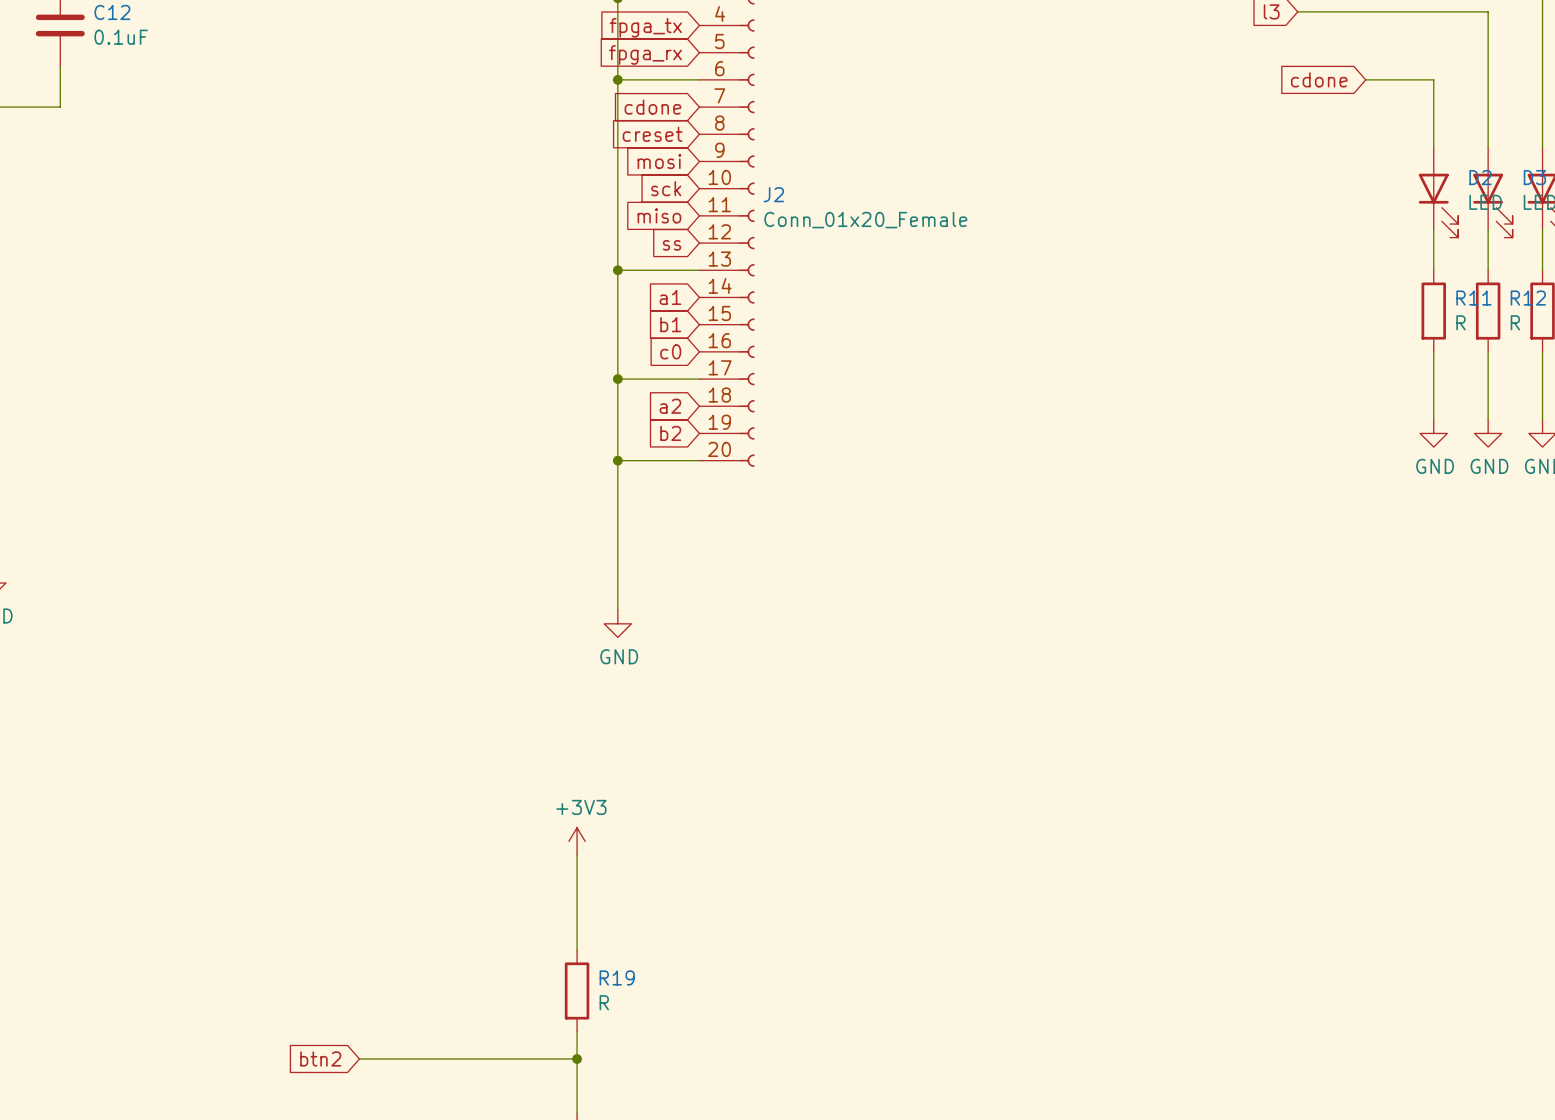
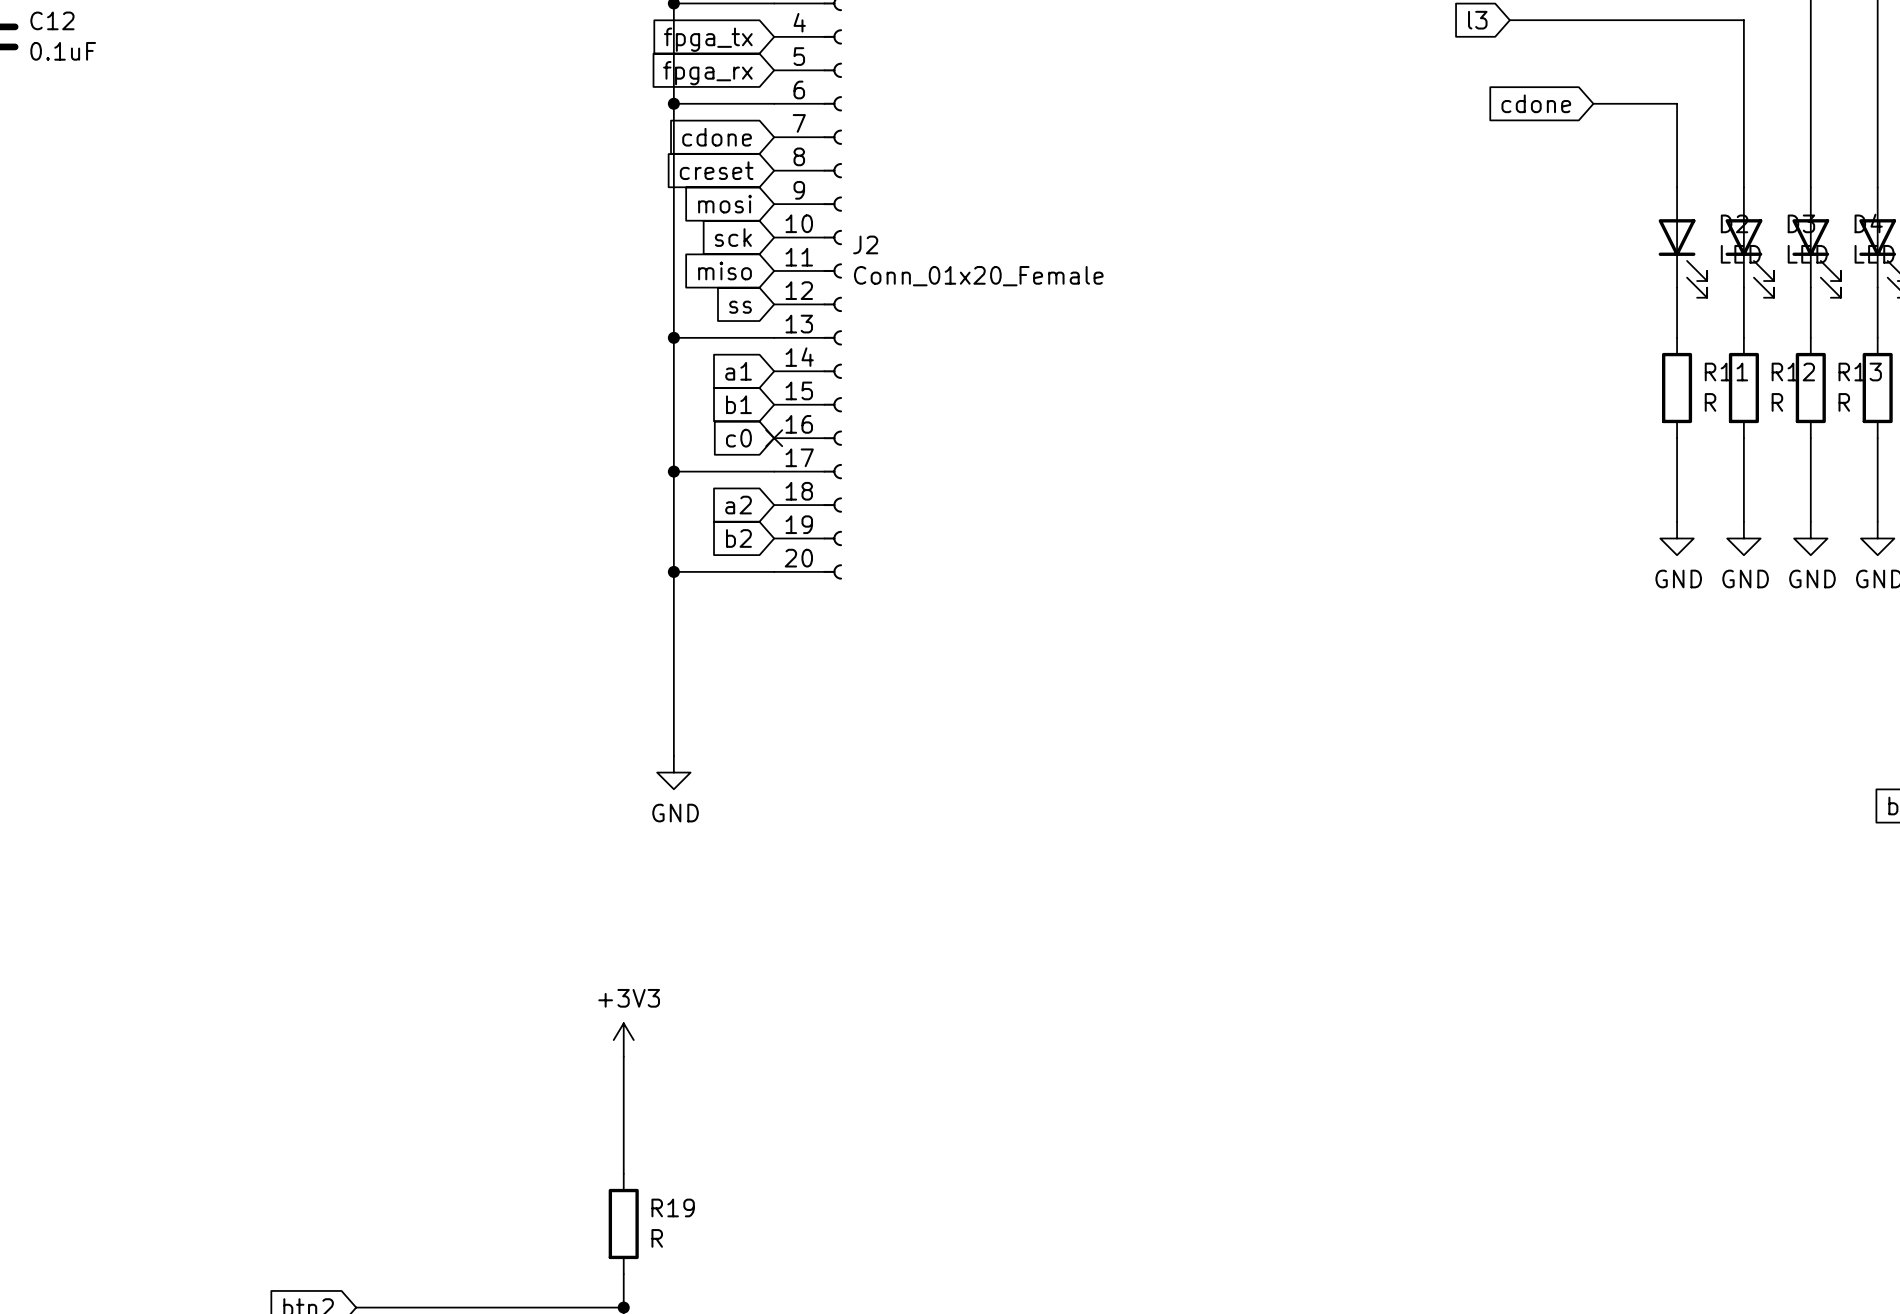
no-connect mark: none -> (774, 438)

